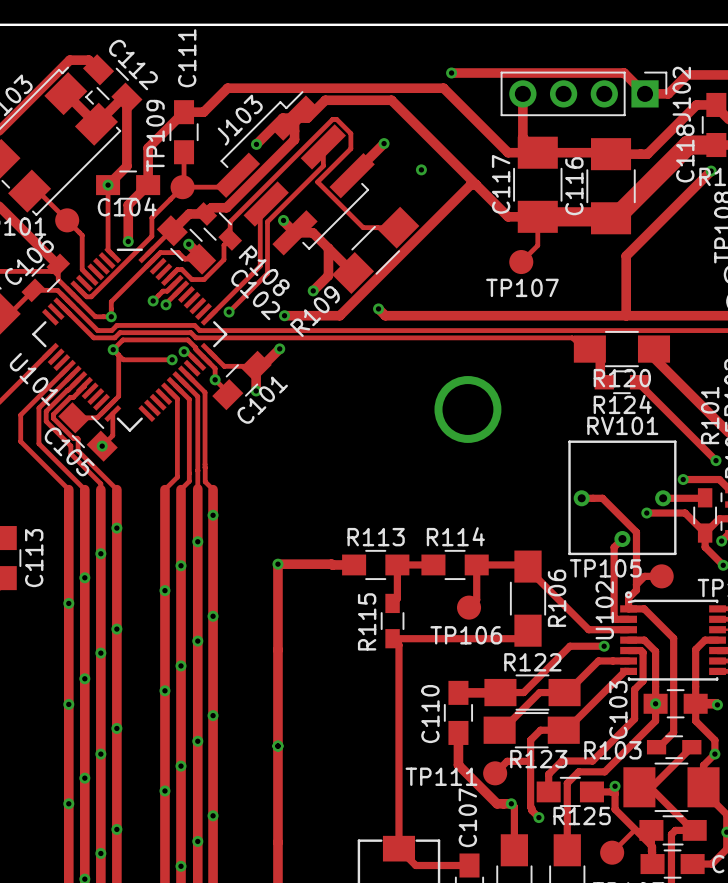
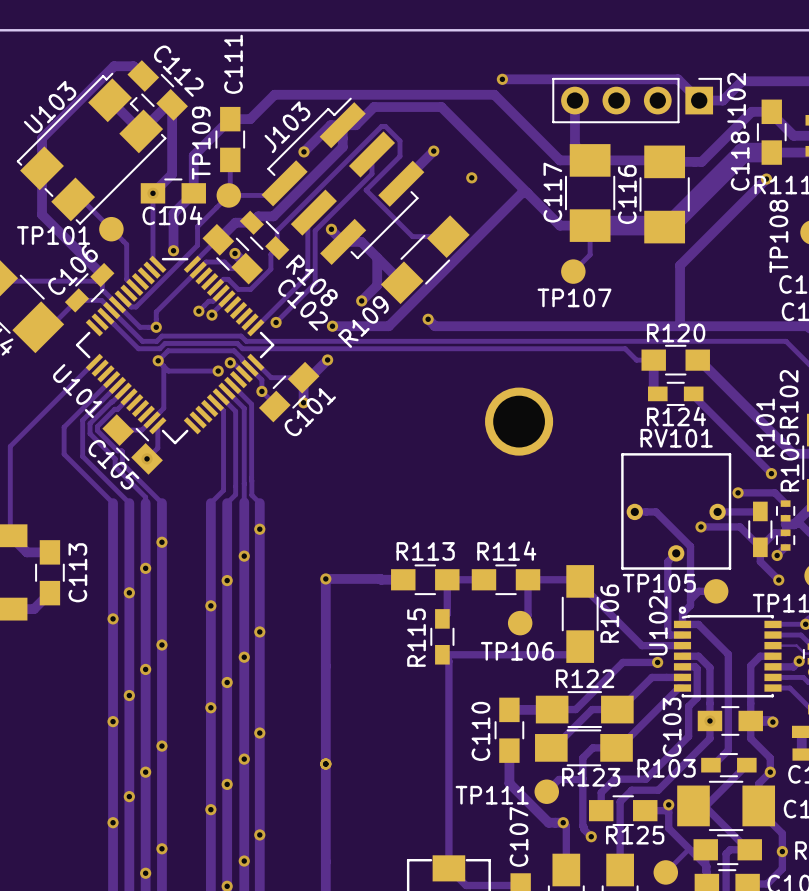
R120 footprint: [573, 330, 671, 368] -> [641, 344, 710, 376]
R120 name position: R120 (622, 378) -> R120 (676, 332)

